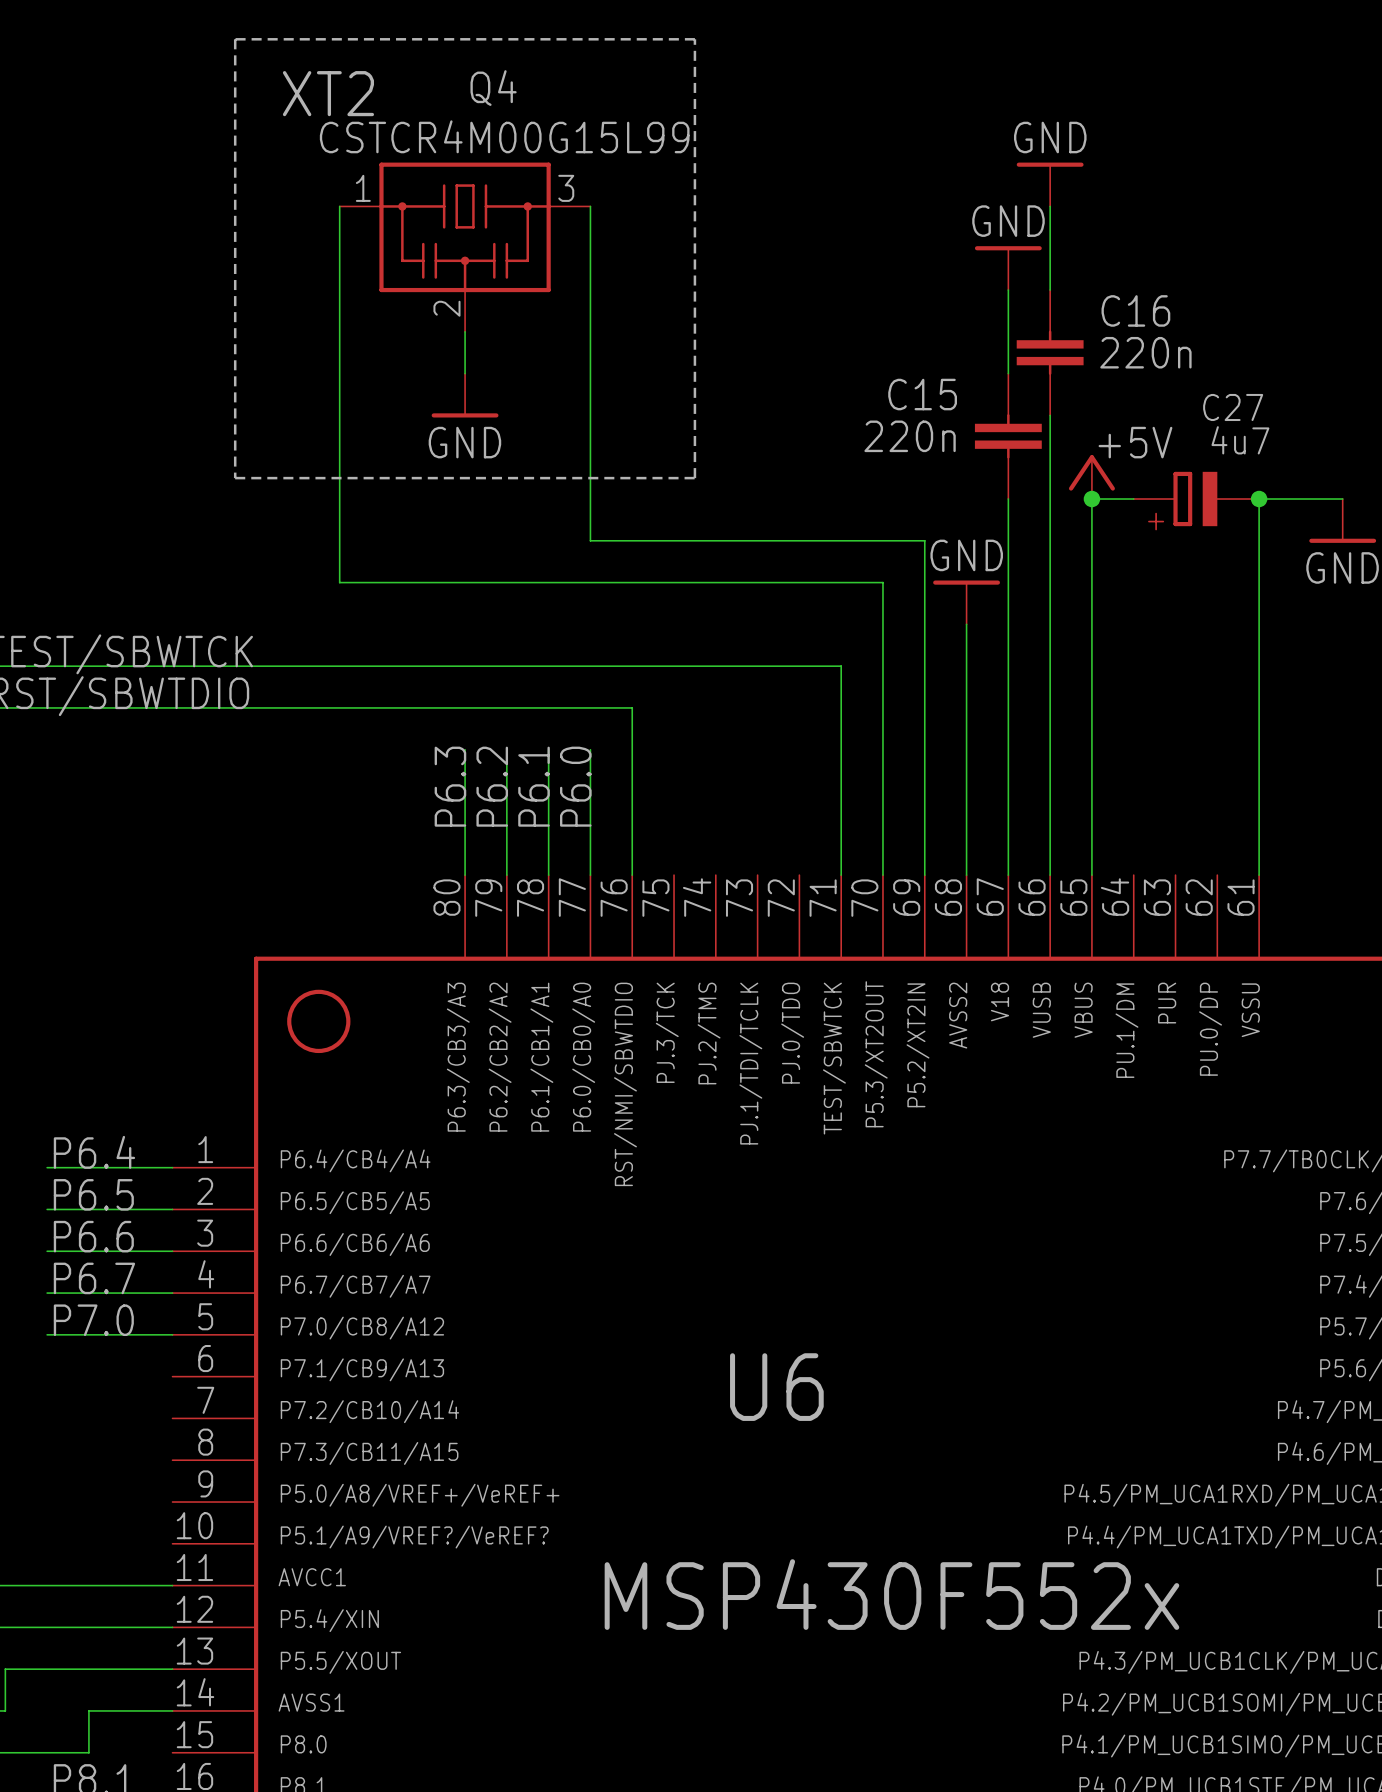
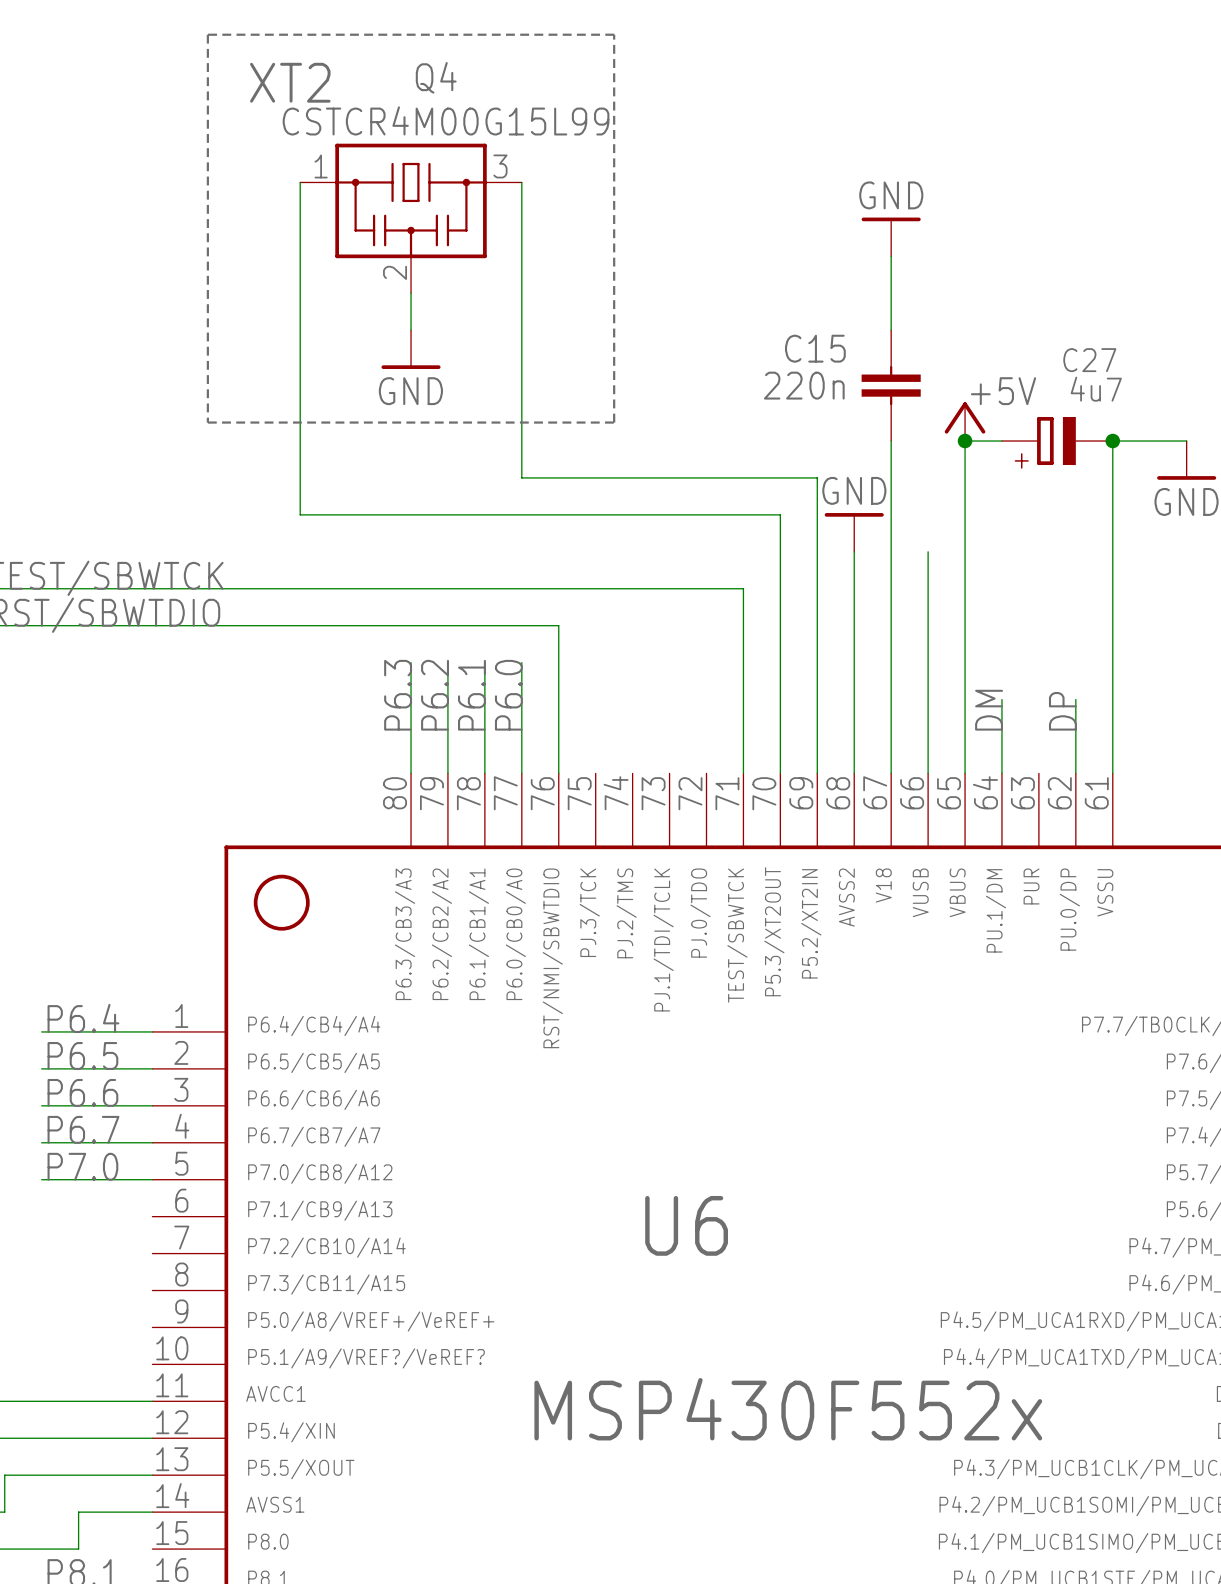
power symbol: GND (1050, 184) -> none
wire: (1050, 206) (1050, 290) -> none
C16: 220n (1050, 352) -> none
wire: (1050, 415) (1050, 624) -> none
wire: none -> (1001, 699) (1001, 773)
wire: none -> (1075, 699) (1075, 773)
label: none -> DM (989, 710)
label: none -> DP (1062, 711)

